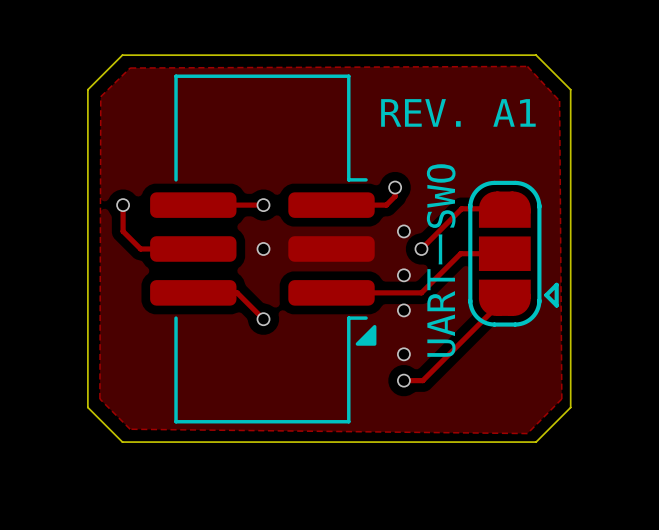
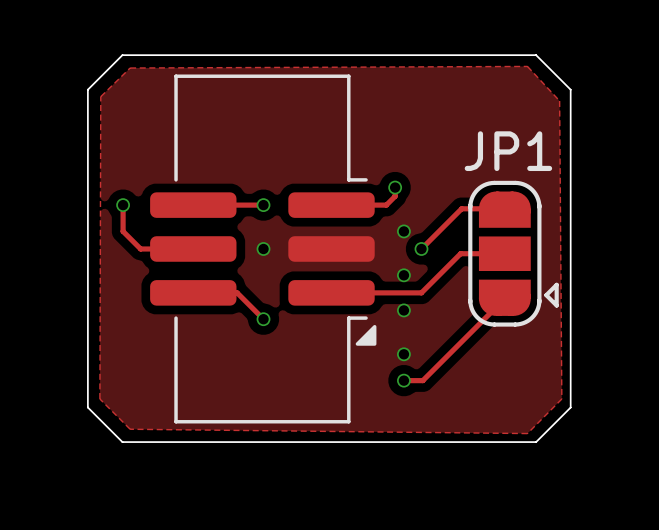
text: REV. A1 (458, 112) -> none
JP1 name: none -> JP1 (508, 151)
text: UARTーSWO (441, 260) -> none

